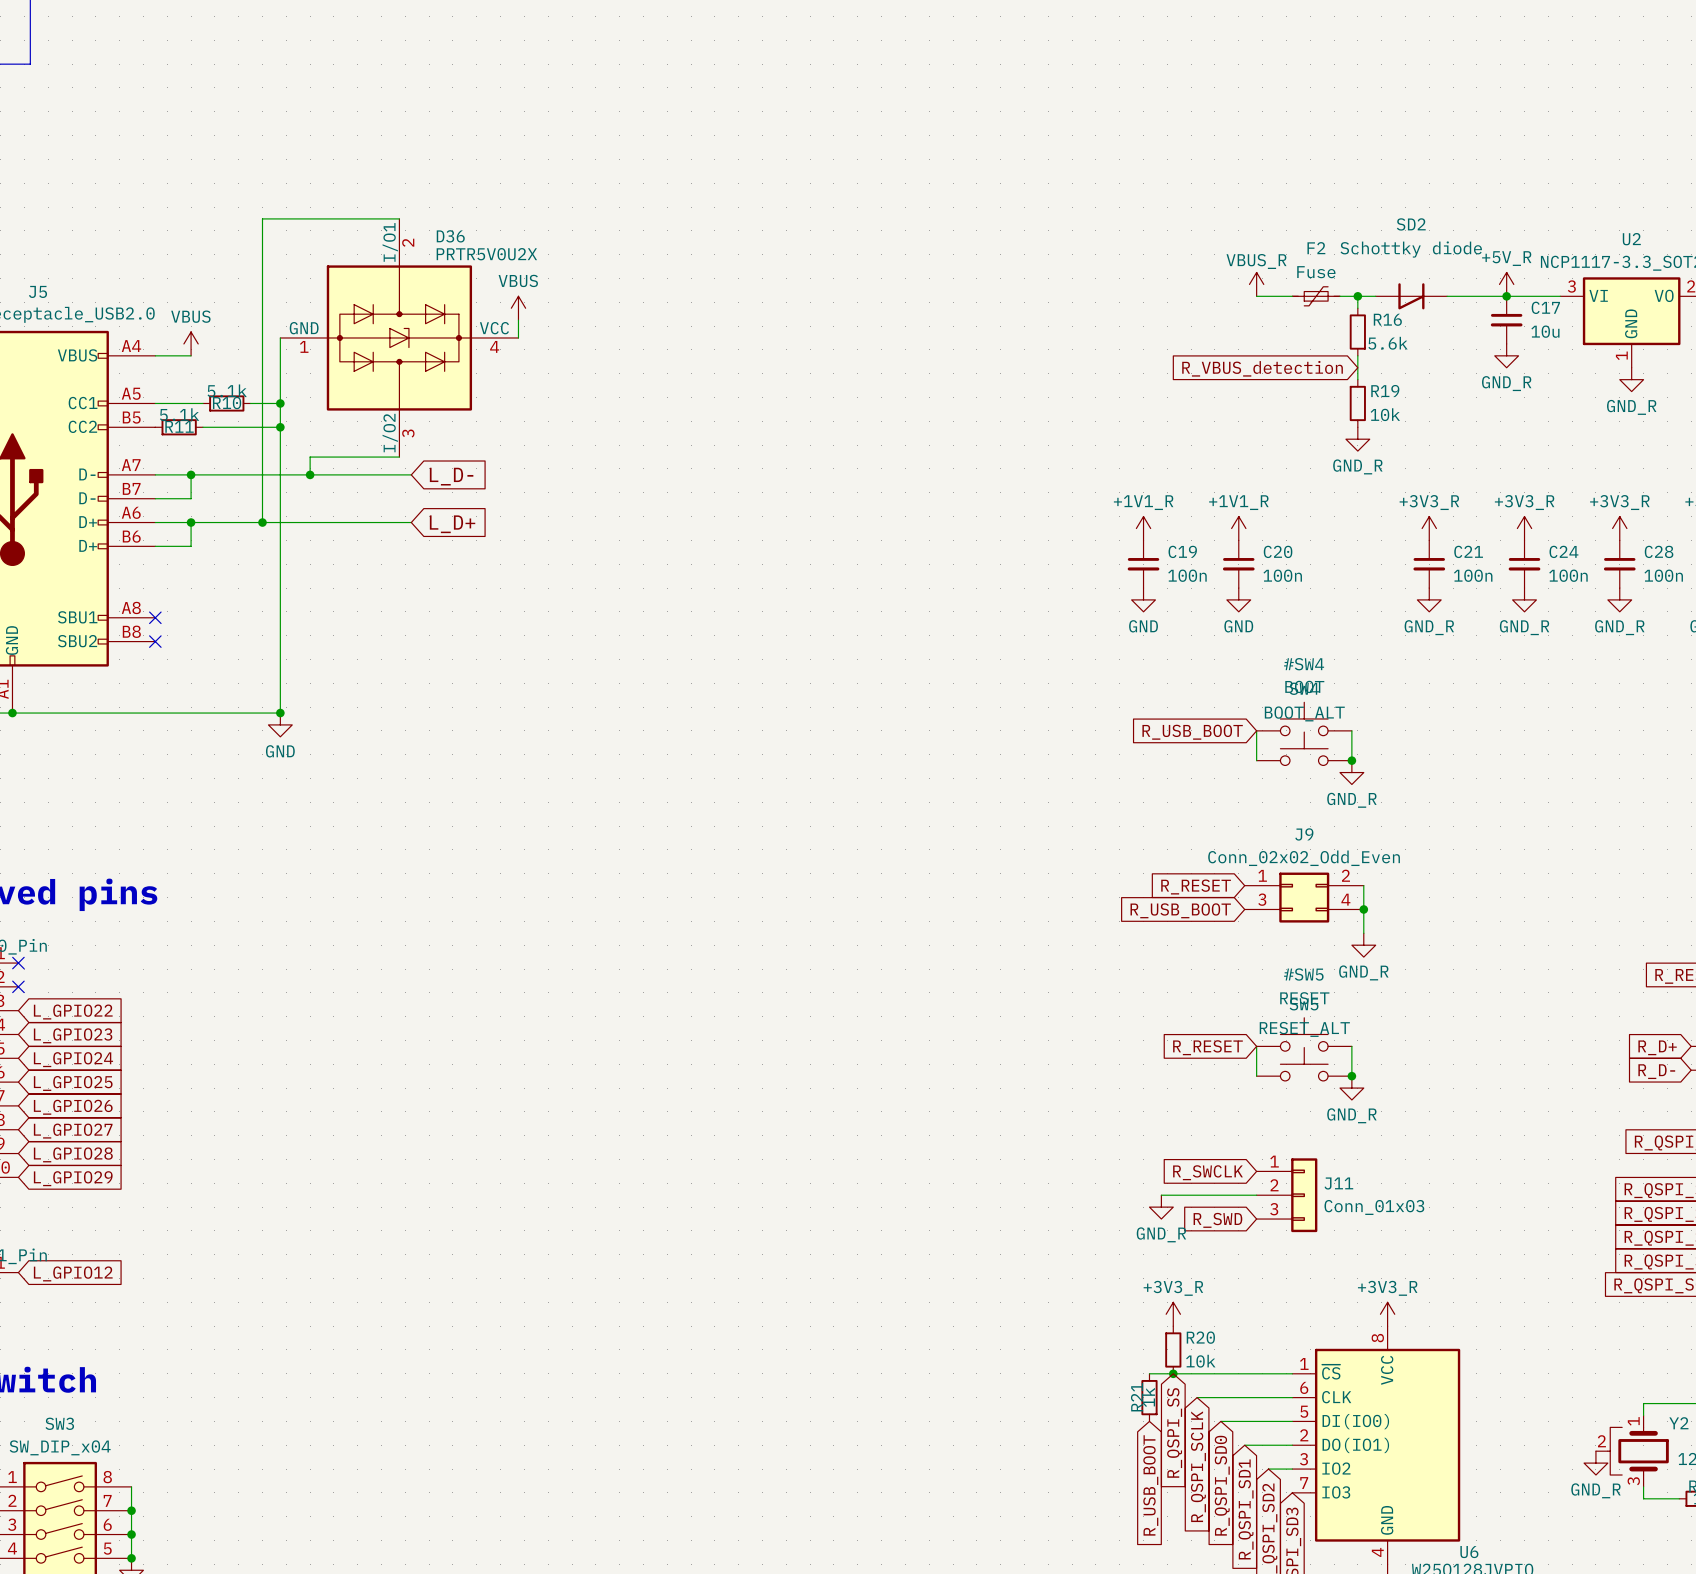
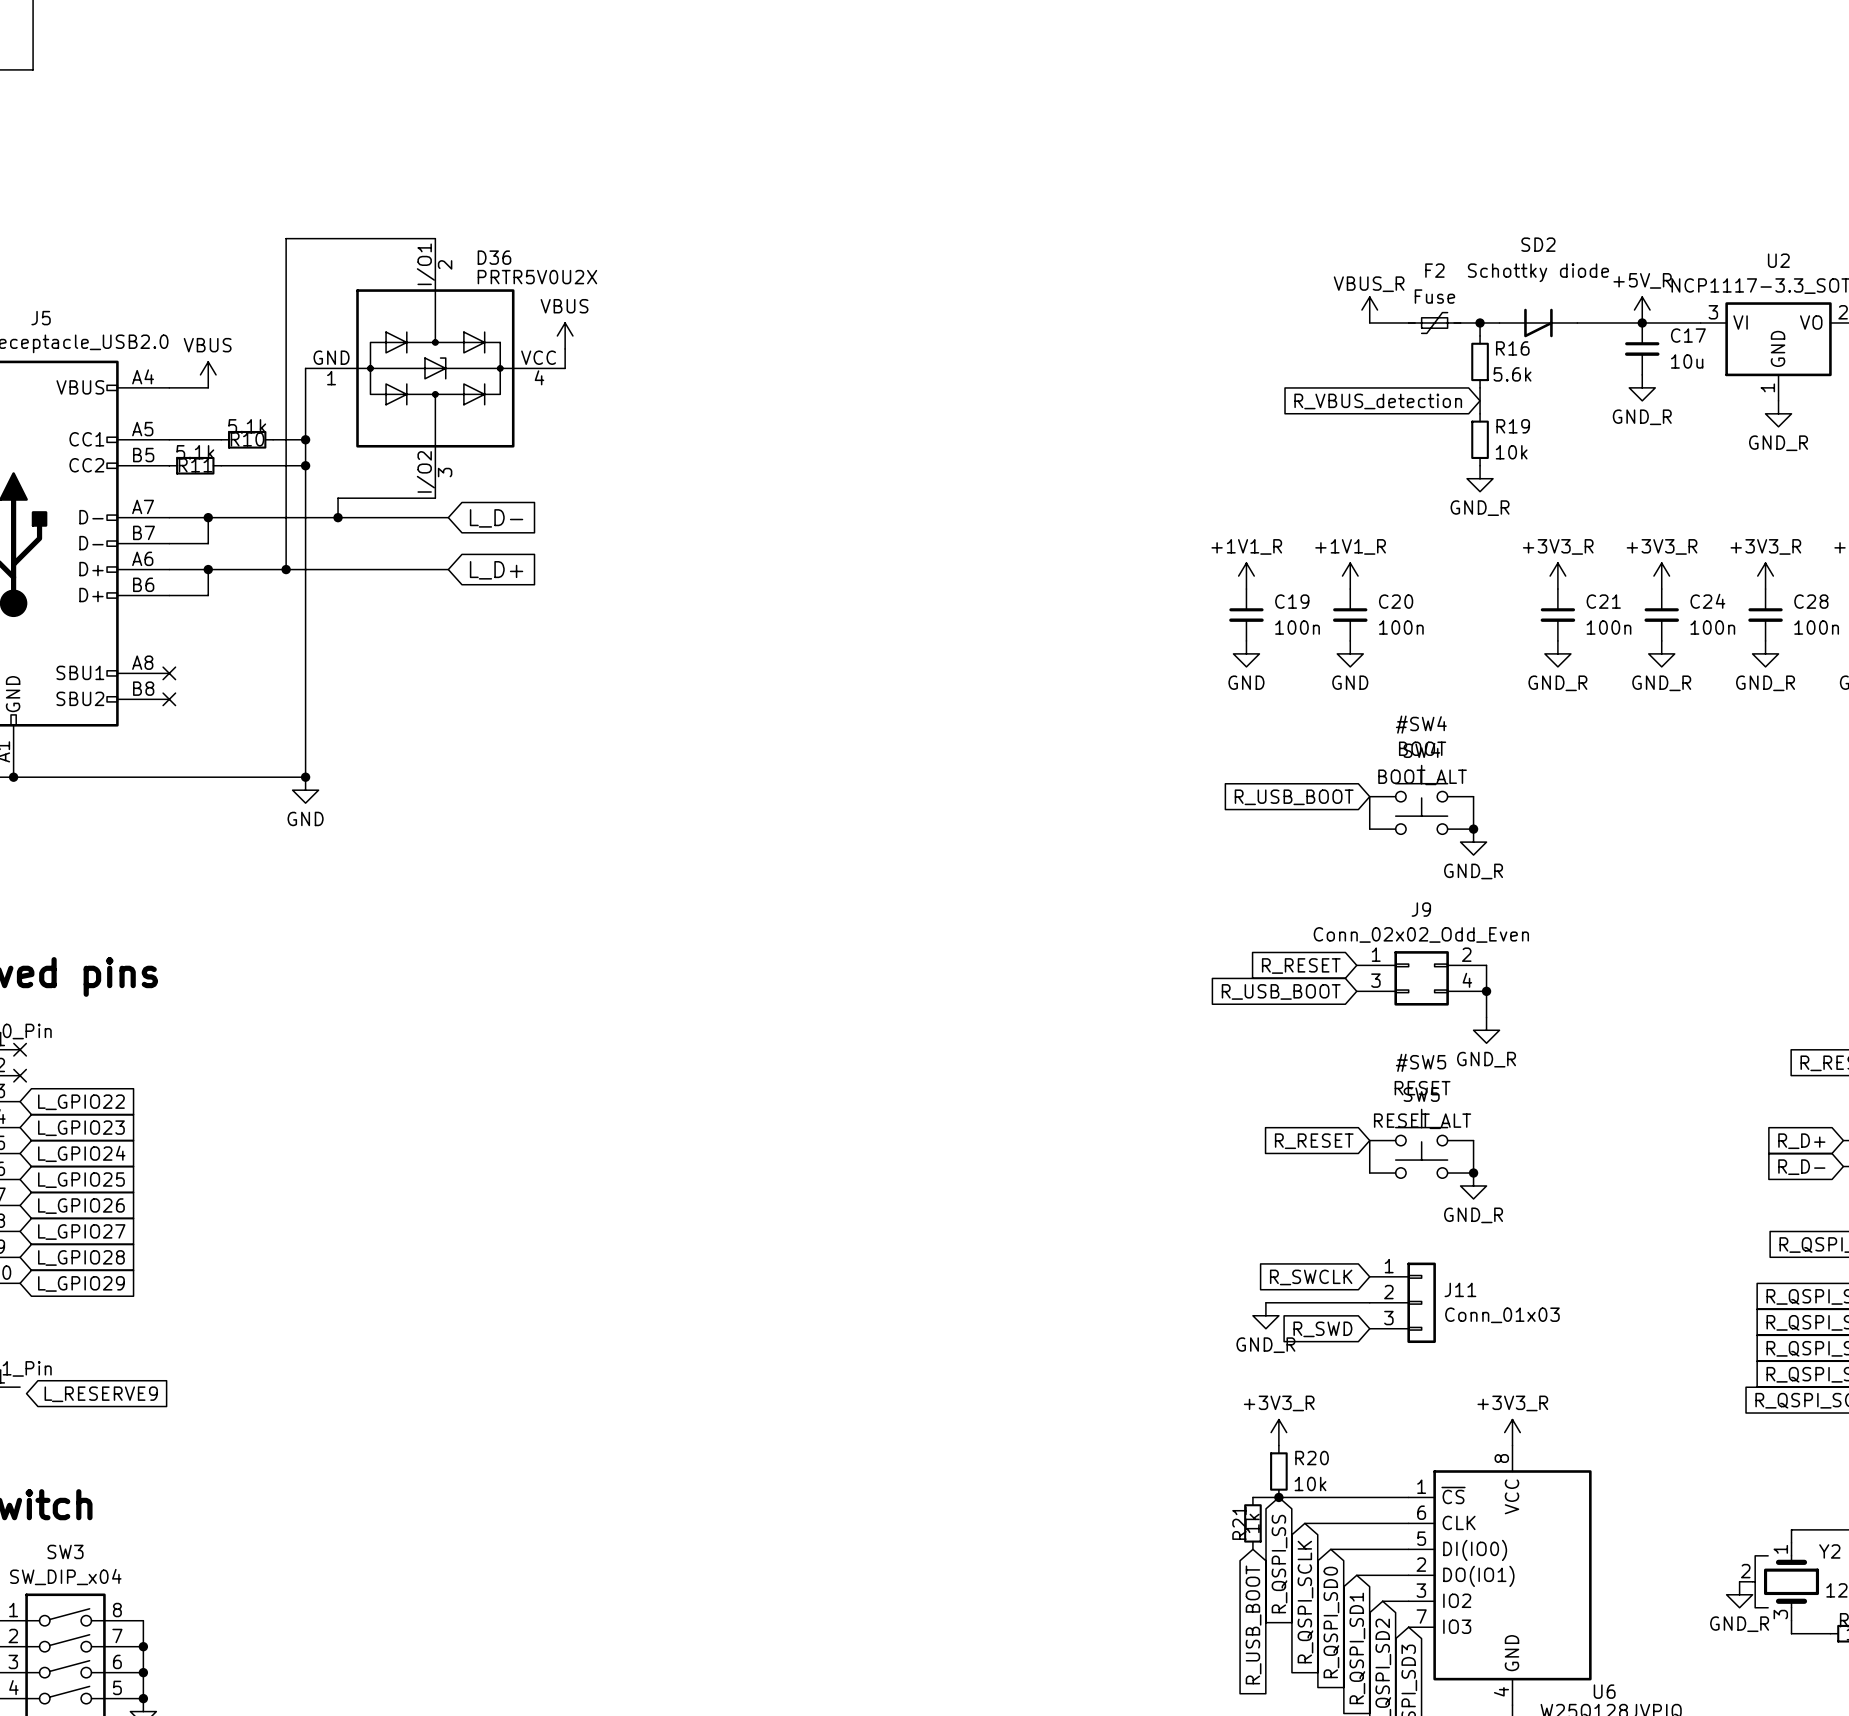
global label: L_GPIO12 (73, 1273) -> L_RESERVE9 (101, 1394)

